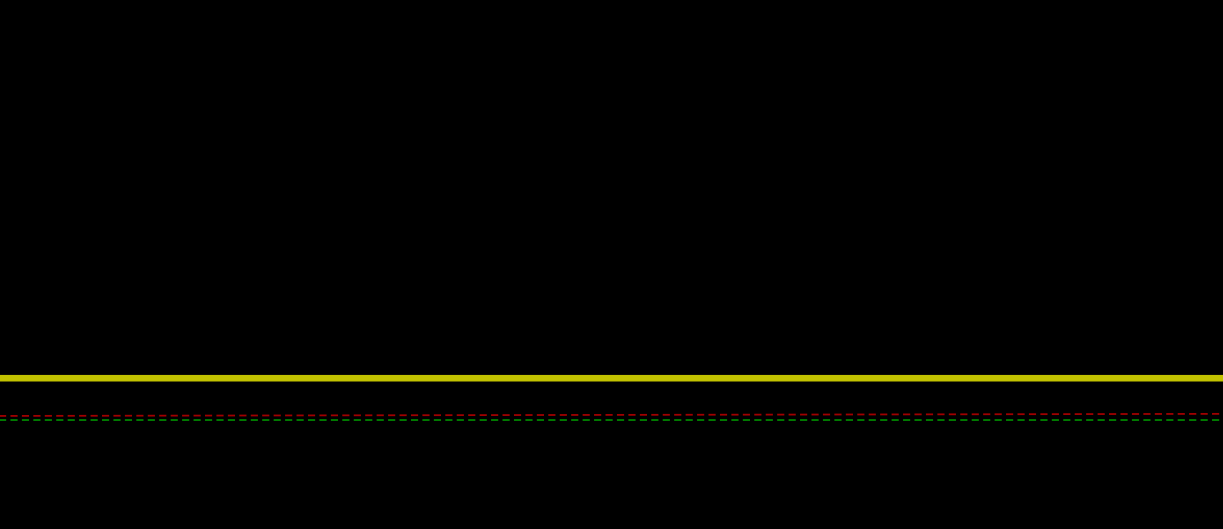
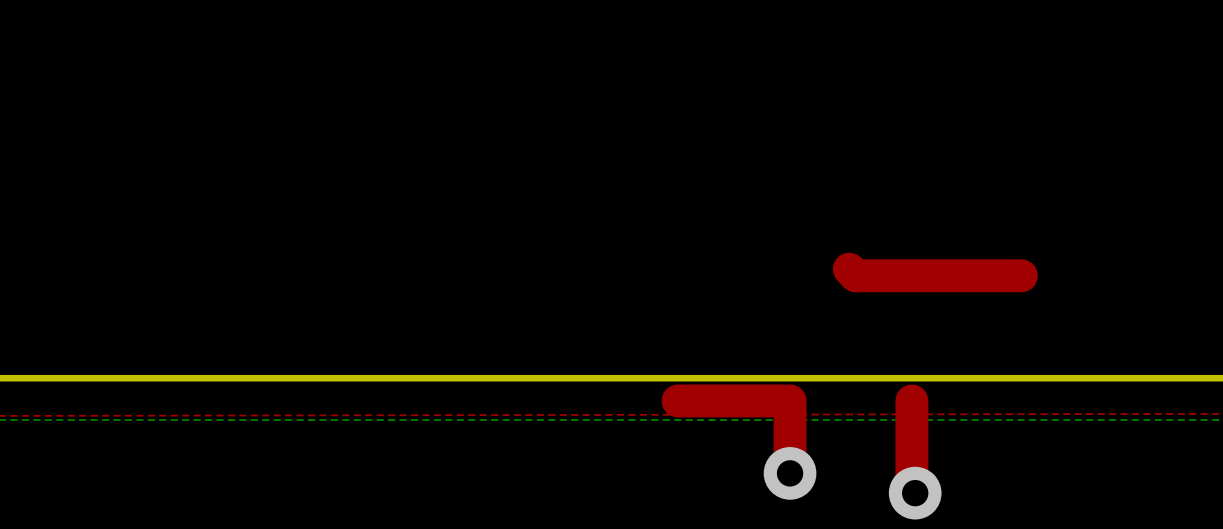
top track: none -> (849, 269) (855, 275) (1021, 275)
top track: none -> (678, 400) (783, 400)
top track: none -> (790, 400) (790, 473)
top track: none -> (911, 400) (911, 489) (915, 493)
via: none -> (790, 473)
via: none -> (915, 493)

